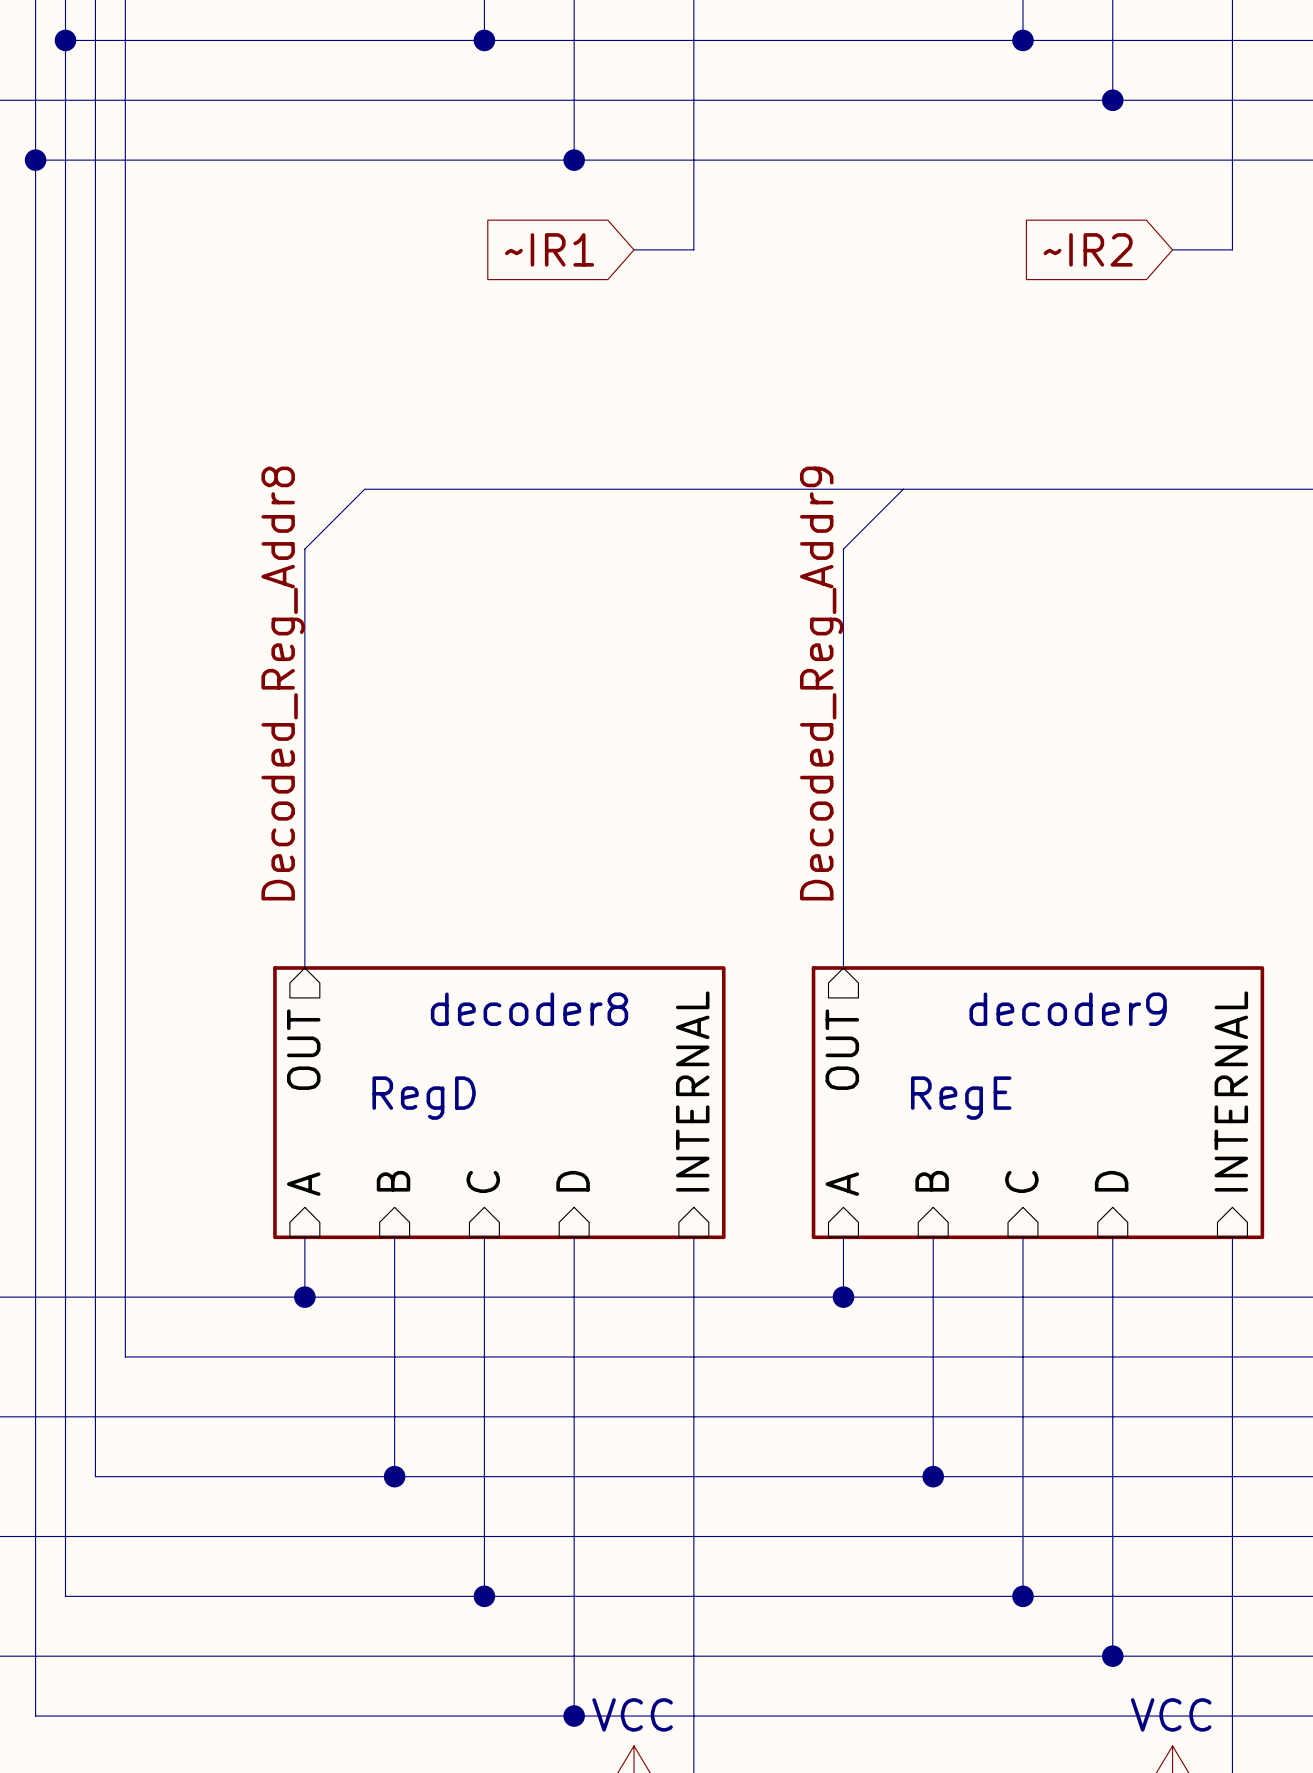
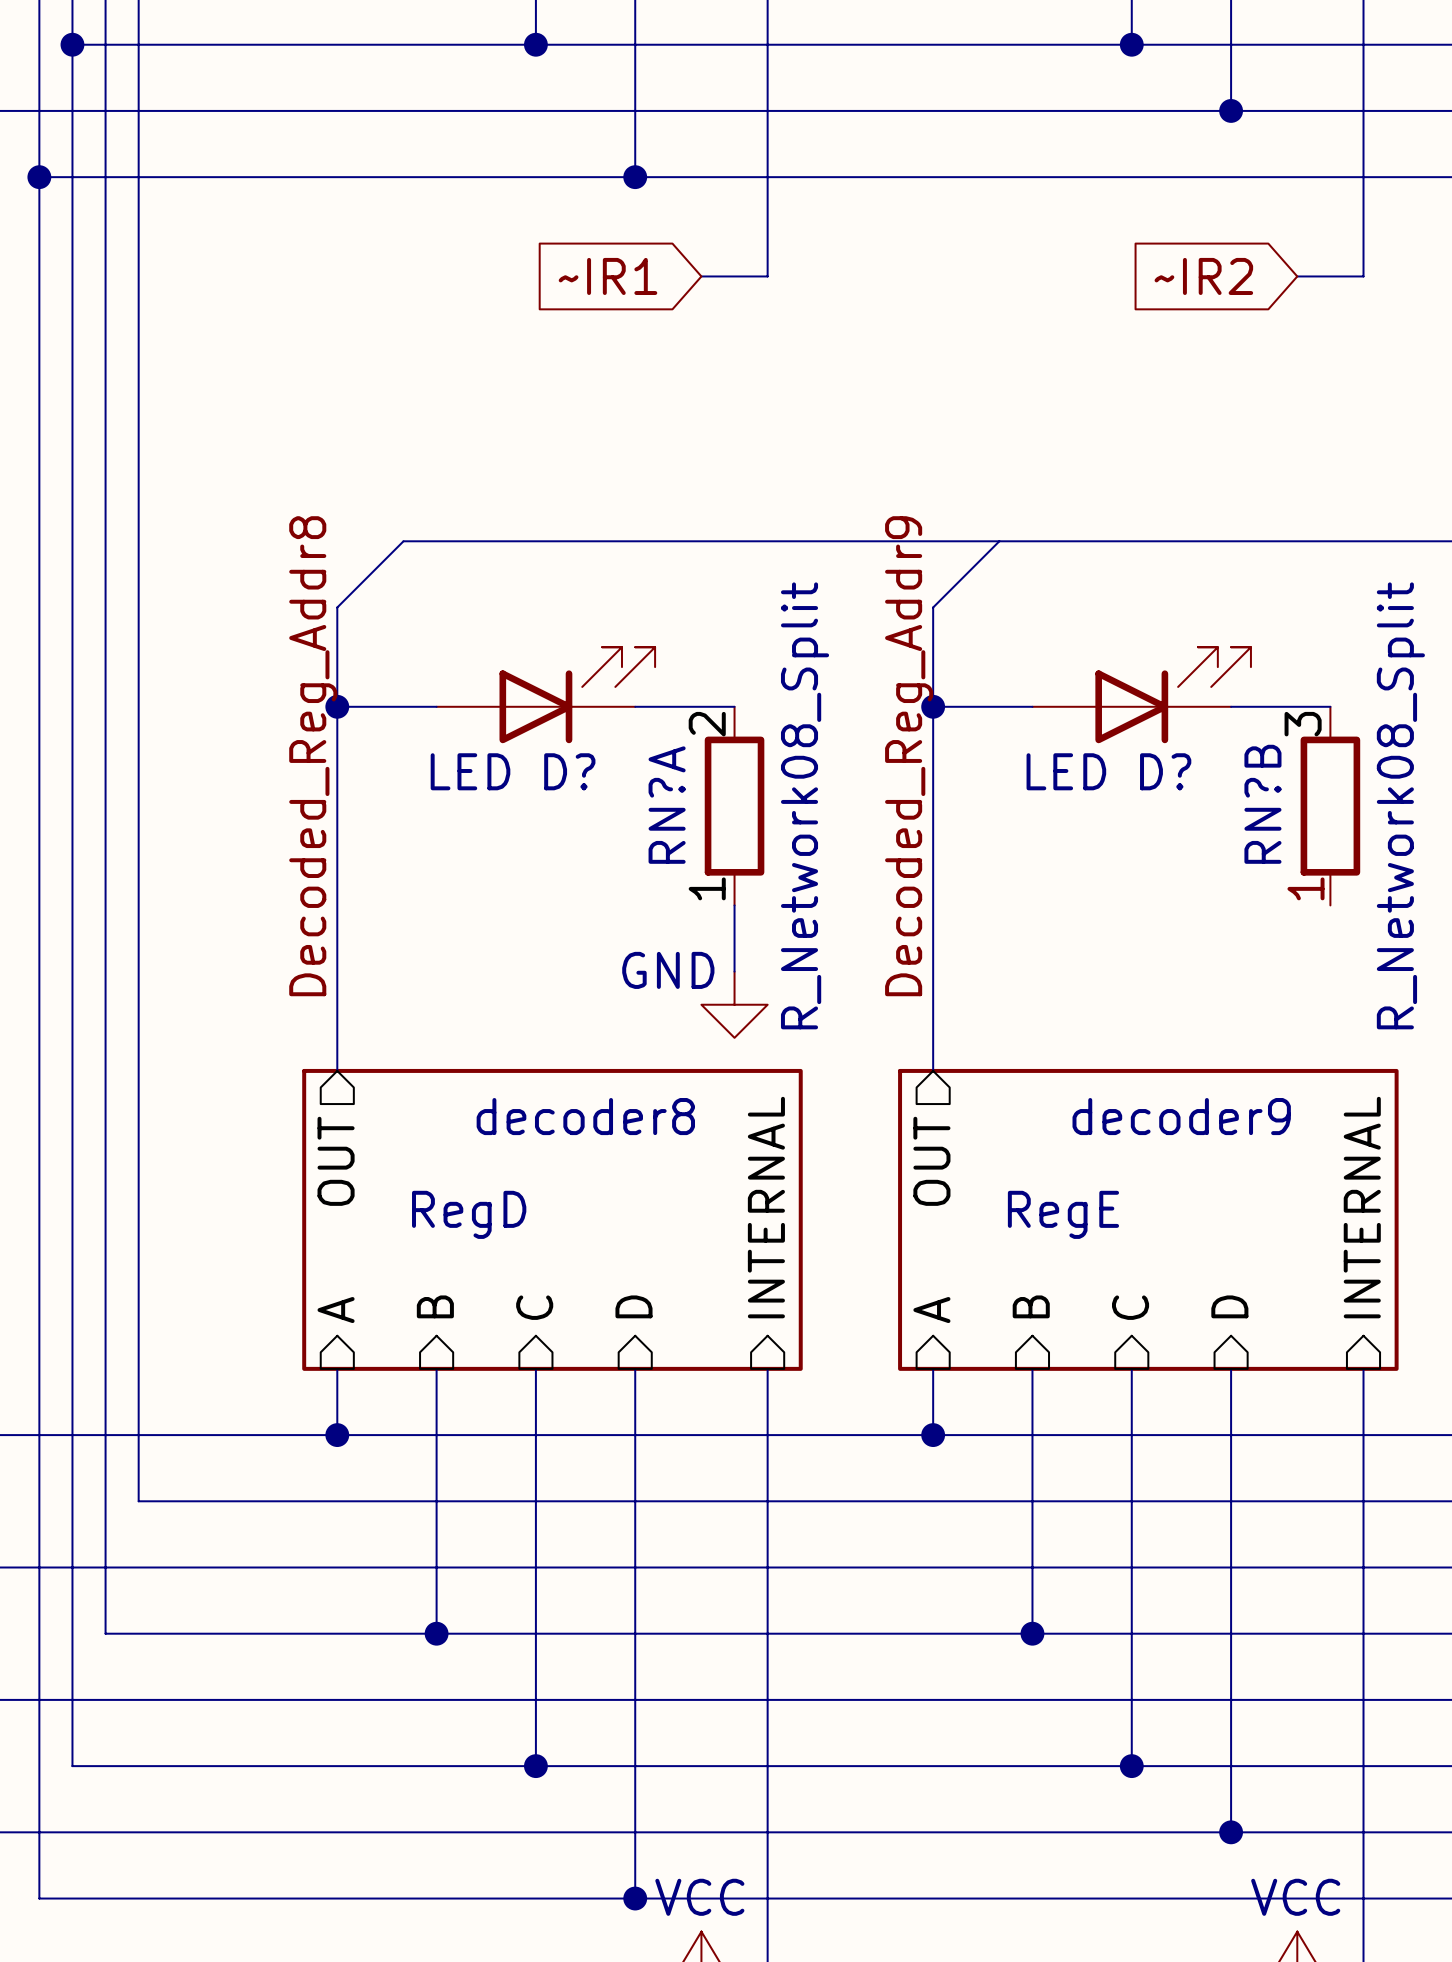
D?: none -> LED (545, 695)
D?: none -> LED (1141, 695)
wire: none -> (337, 706) (436, 706)
junction: none -> (337, 706)
wire: none -> (635, 706) (734, 706)
wire: none -> (933, 706) (1032, 706)
junction: none -> (933, 706)
wire: none -> (1231, 706) (1330, 706)
RN?A: none -> R_Network08_Split (734, 806)
RN?B: none -> R_Network08_Split (1330, 806)
wire: none -> (734, 905) (734, 971)
power symbol: none -> GND (734, 1004)

